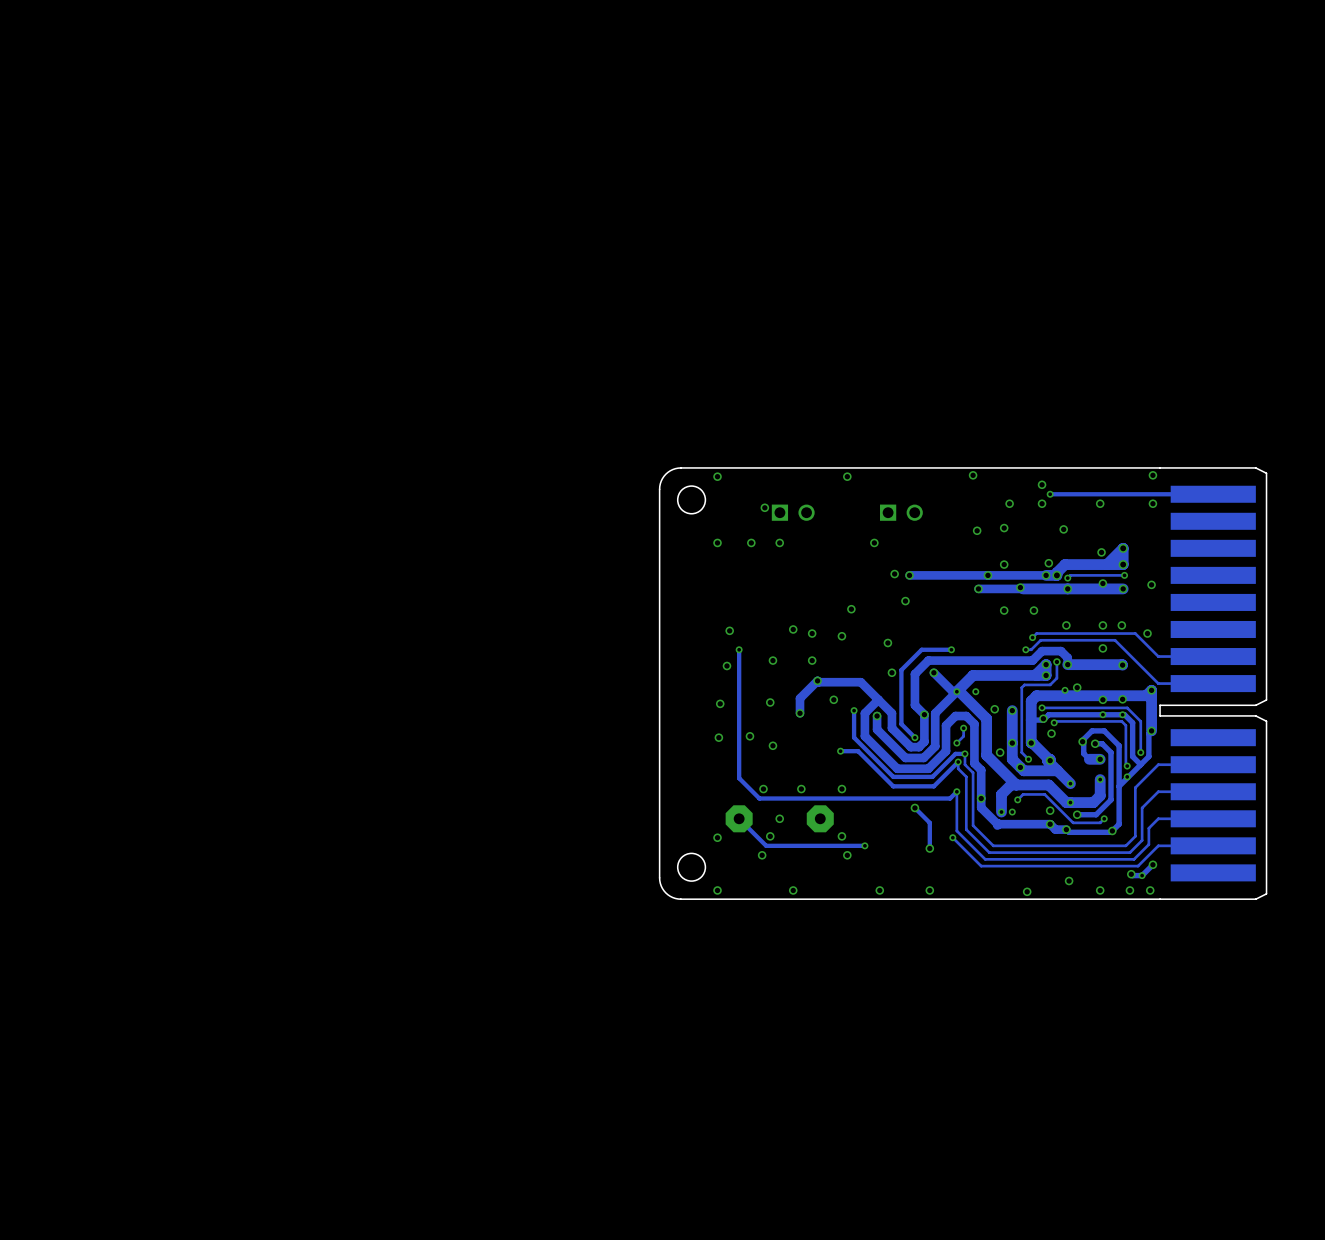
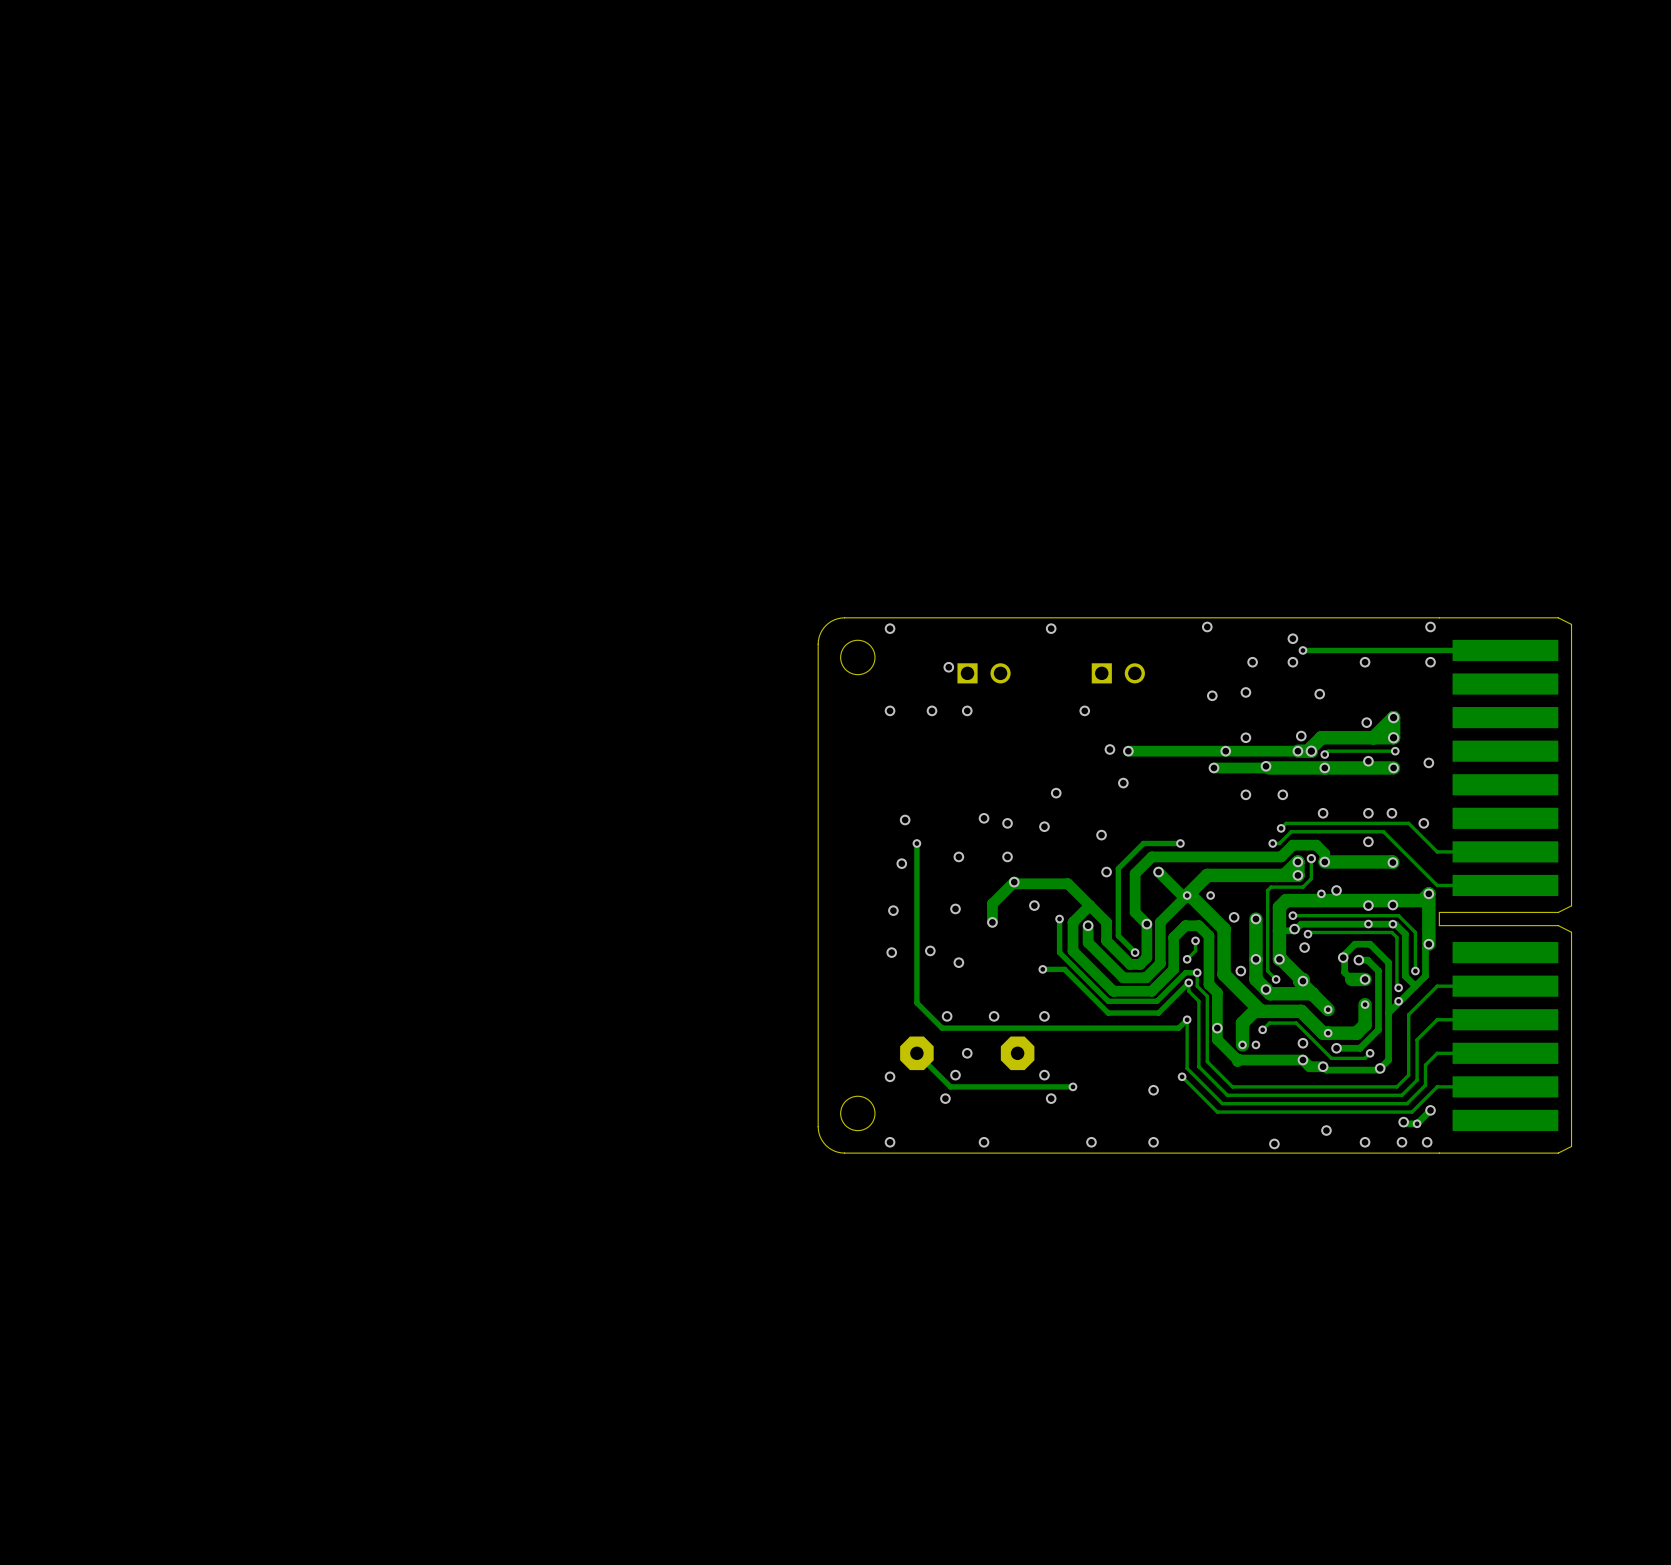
track: (914, 807) (929, 822) (929, 848) -> none
via: (914, 807) -> none

